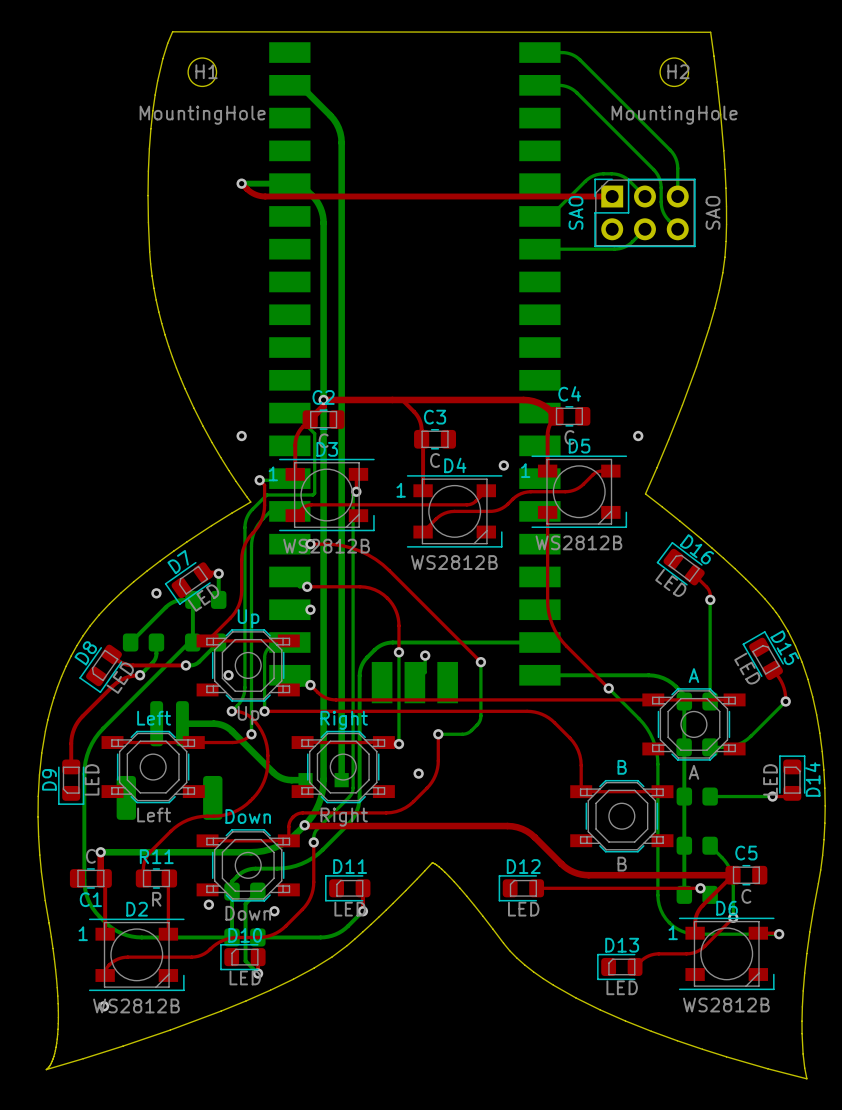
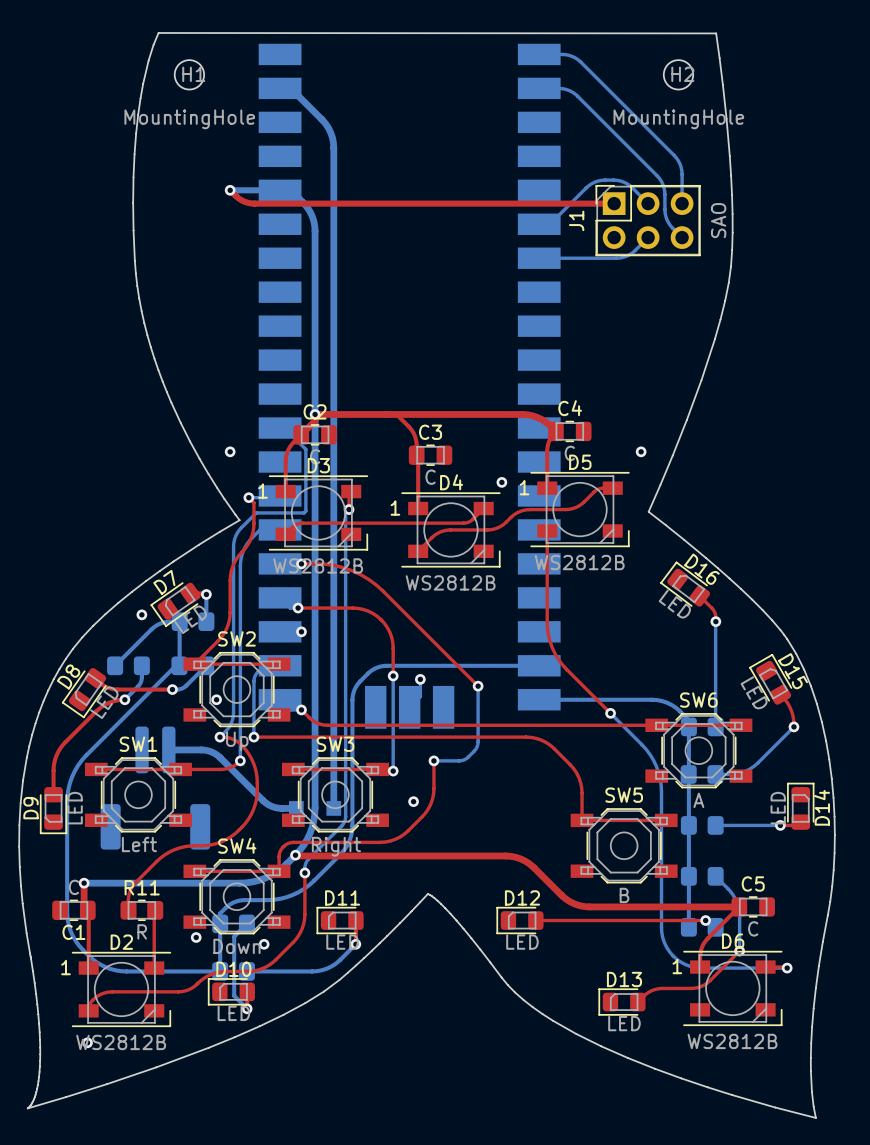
SAO name: SAO (575, 212) -> J1 (576, 220)
Up name: Up (248, 618) -> SW2 (236, 638)
A name: A (693, 675) -> SW6 (698, 700)
Left name: Left (154, 718) -> SW1 (138, 744)
Right name: Right (344, 720) -> SW3 (335, 744)
B name: B (622, 767) -> SW5 (624, 795)
Down name: Down (248, 816) -> SW4 (237, 845)

